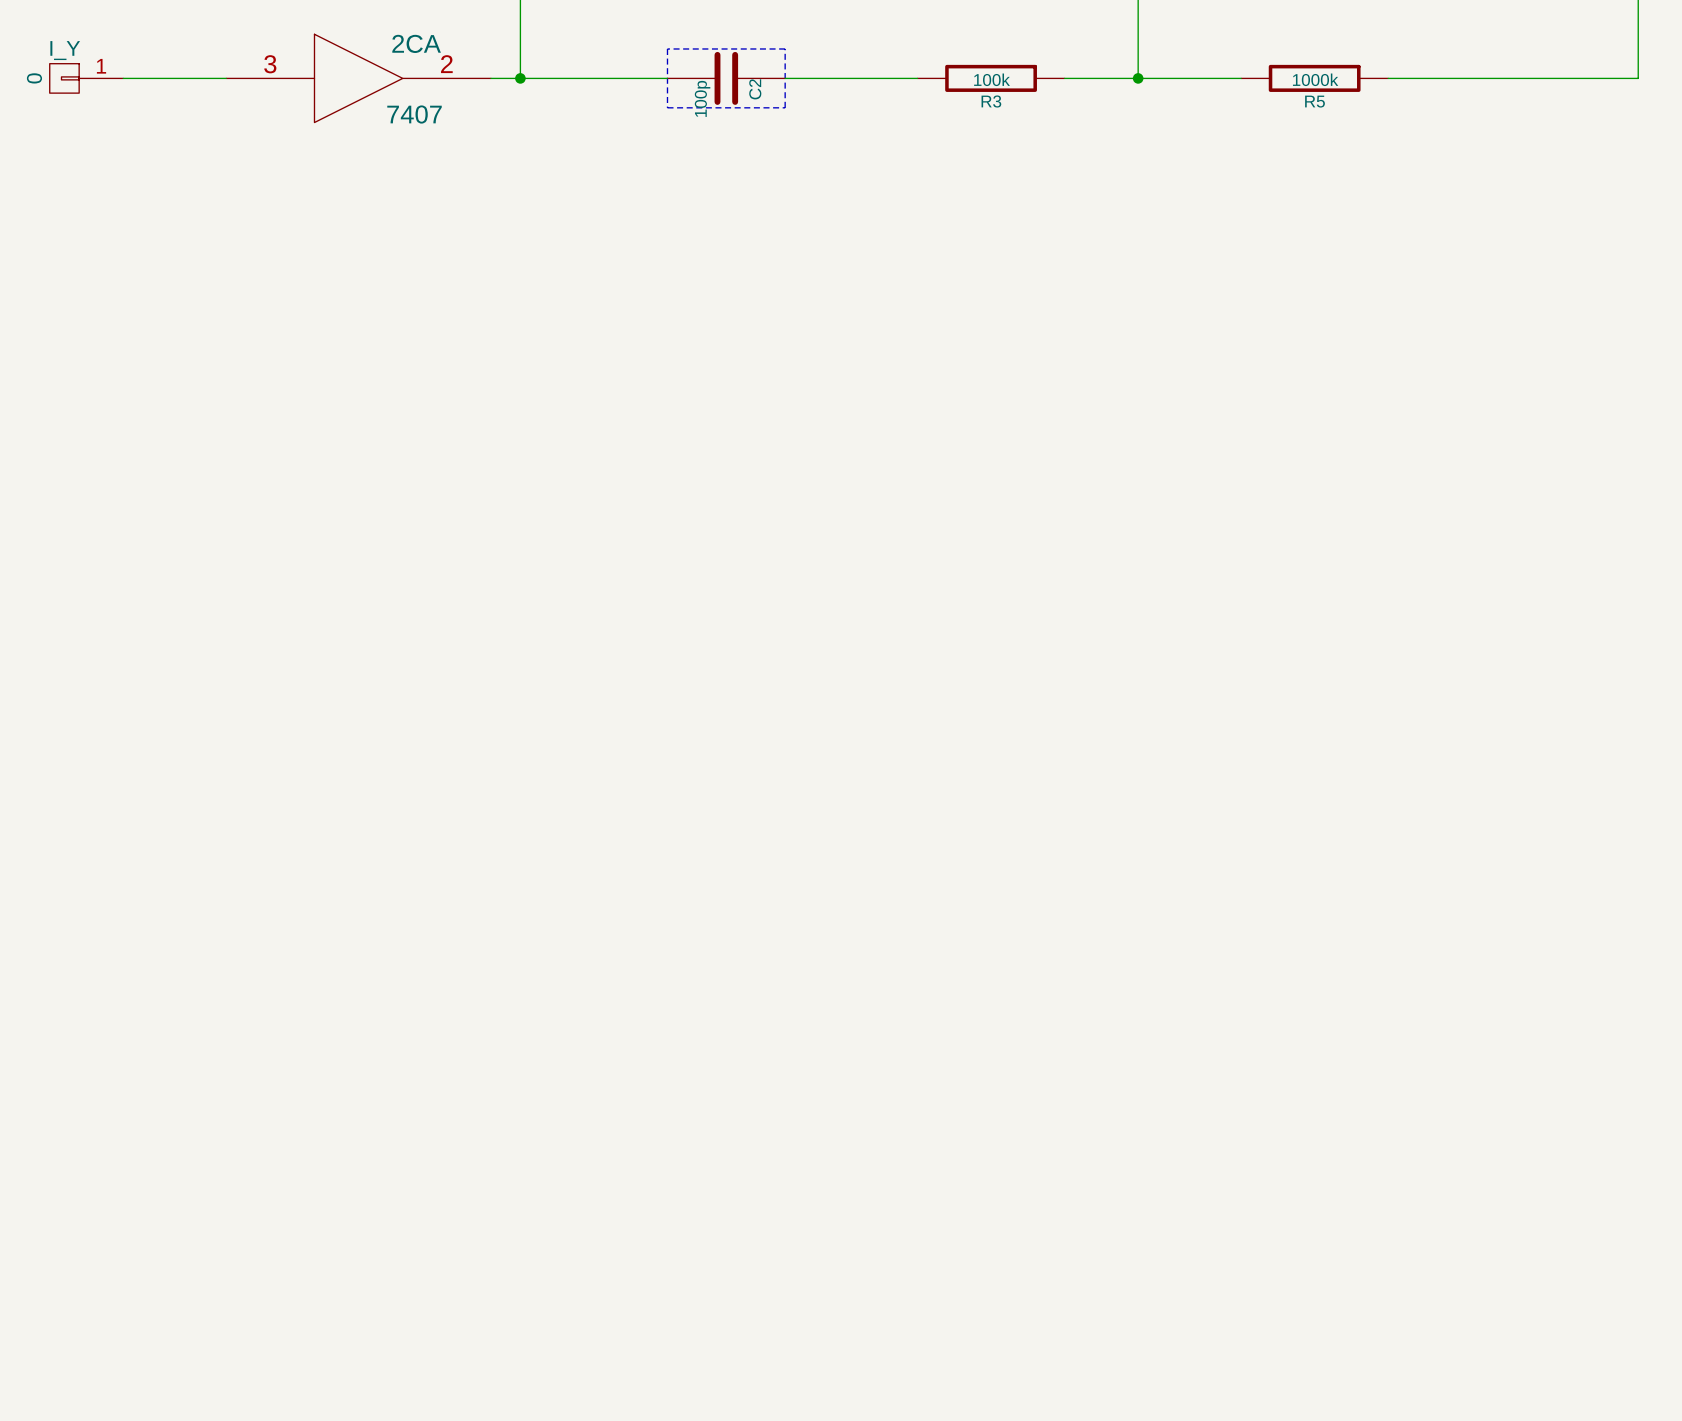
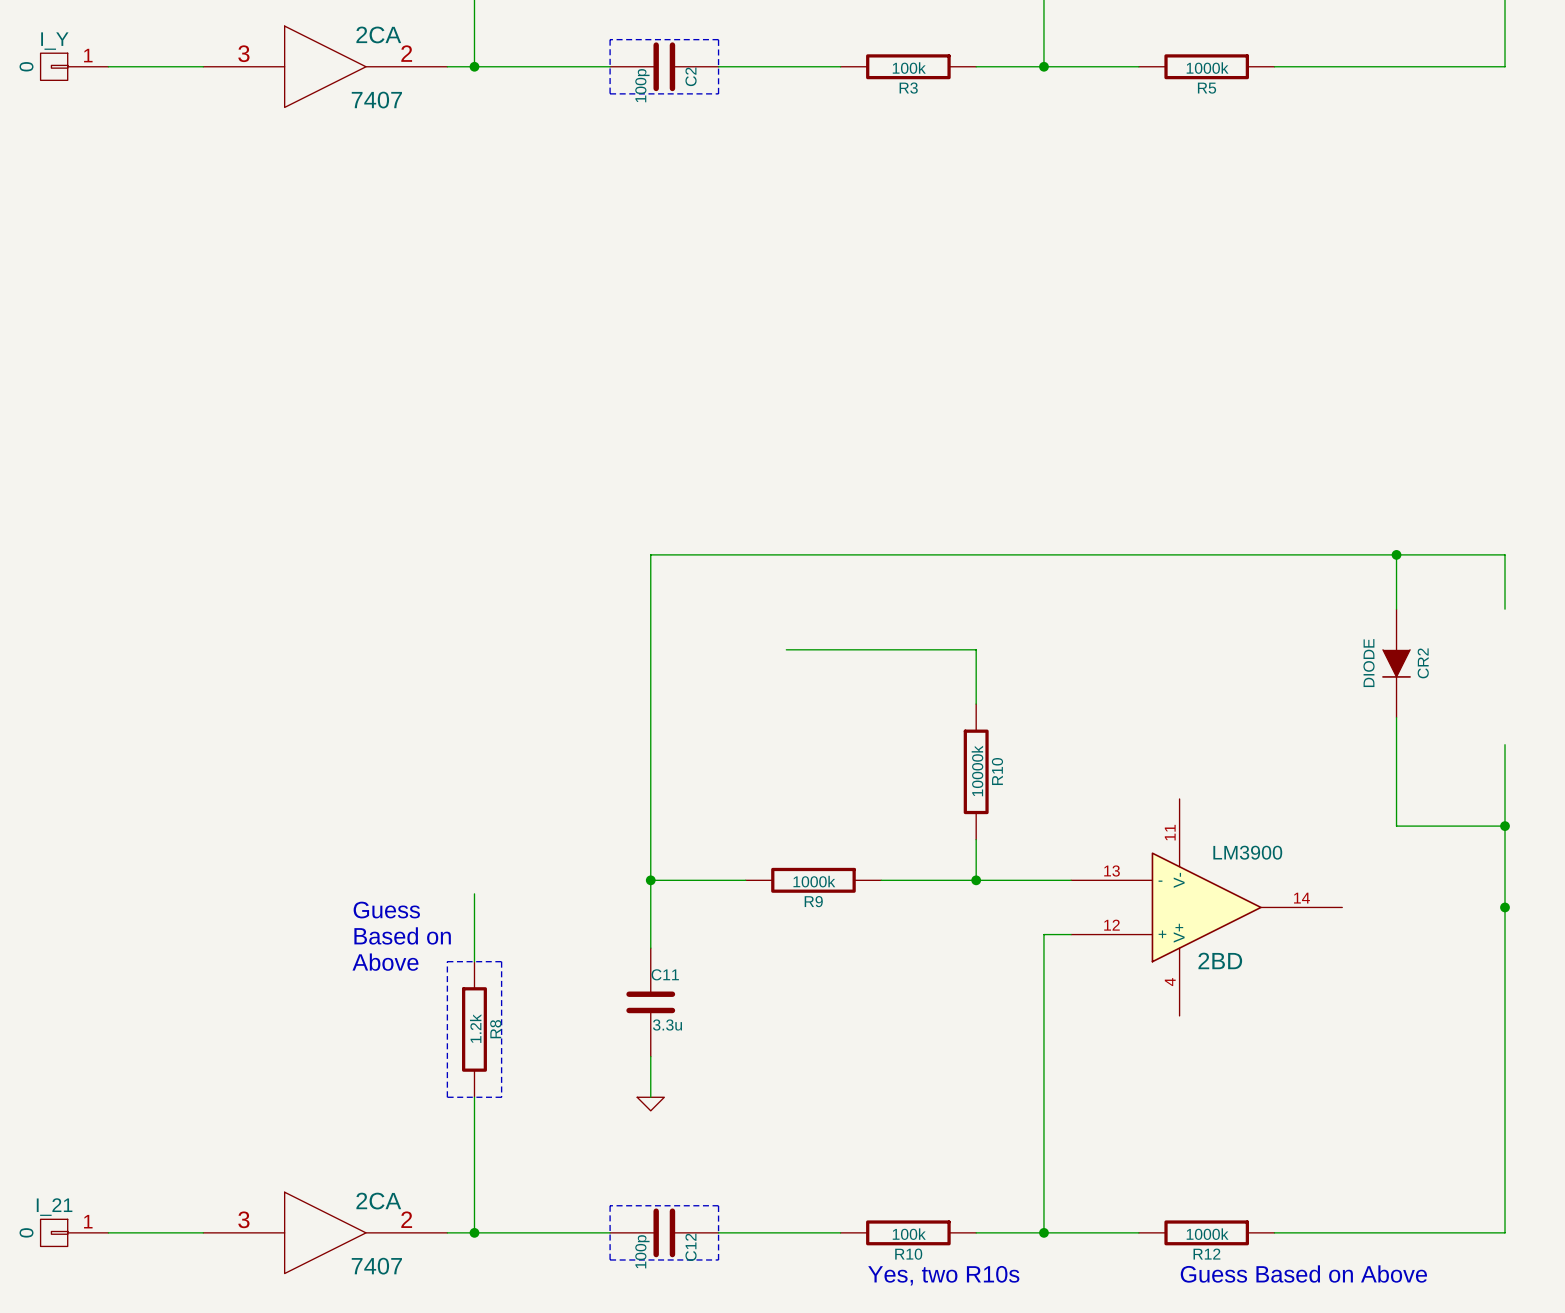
wire: none -> (1396, 554) (1396, 609)
junction: none -> (1396, 554)
wire: none -> (1505, 609) (1505, 554) (650, 554) (650, 948)
wire: none -> (786, 649) (976, 649) (976, 704)
CR2: none -> DIODE (1396, 663)
wire: none -> (1396, 717) (1396, 826) (1505, 826)
wire: none -> (1505, 744) (1505, 1232) (1274, 1232)
R10: none -> 10000k (976, 771)
junction: none -> (1505, 826)
wire: none -> (976, 839) (976, 880)
wire: none -> (650, 880) (745, 880)
junction: none -> (650, 880)
R9: none -> 1000k (813, 880)
wire: none -> (881, 880) (1071, 880)
junction: none -> (976, 880)
wire: none -> (474, 893) (474, 961)
2BD: none -> LM3900 (1206, 907)
junction: none -> (1505, 907)
text: none -> Guess (386, 910)
wire: none -> (1071, 934) (1043, 934) (1043, 1232)
text: none -> Based on (402, 935)
text: none -> Above (385, 962)
line: none -> (447, 961) (501, 961) (501, 1097) (447, 1097) (447, 961)
C11: none -> 3.3u (650, 1002)
R8: none -> 1.2k (474, 1029)
wire: none -> (650, 1056) (650, 1097)
wire: none -> (474, 1097) (474, 1232)
power symbol: none -> (650, 1104)
line: none -> (610, 1205) (610, 1259) (718, 1259) (718, 1205) (610, 1205)
I_21: none -> 0 (74, 1232)
wire: none -> (108, 1232) (203, 1232)
2CA: none -> 7407 (325, 1232)
wire: none -> (447, 1232) (610, 1232)
junction: none -> (474, 1232)
C12: none -> 100p (664, 1232)
wire: none -> (718, 1232) (840, 1232)
R10: none -> 100k (908, 1232)
wire: none -> (976, 1232) (1138, 1232)
junction: none -> (1043, 1232)
R12: none -> 1000k (1206, 1232)
text: none -> Guess Based on Above (1303, 1273)
text: none -> Yes, two R10s (943, 1275)

